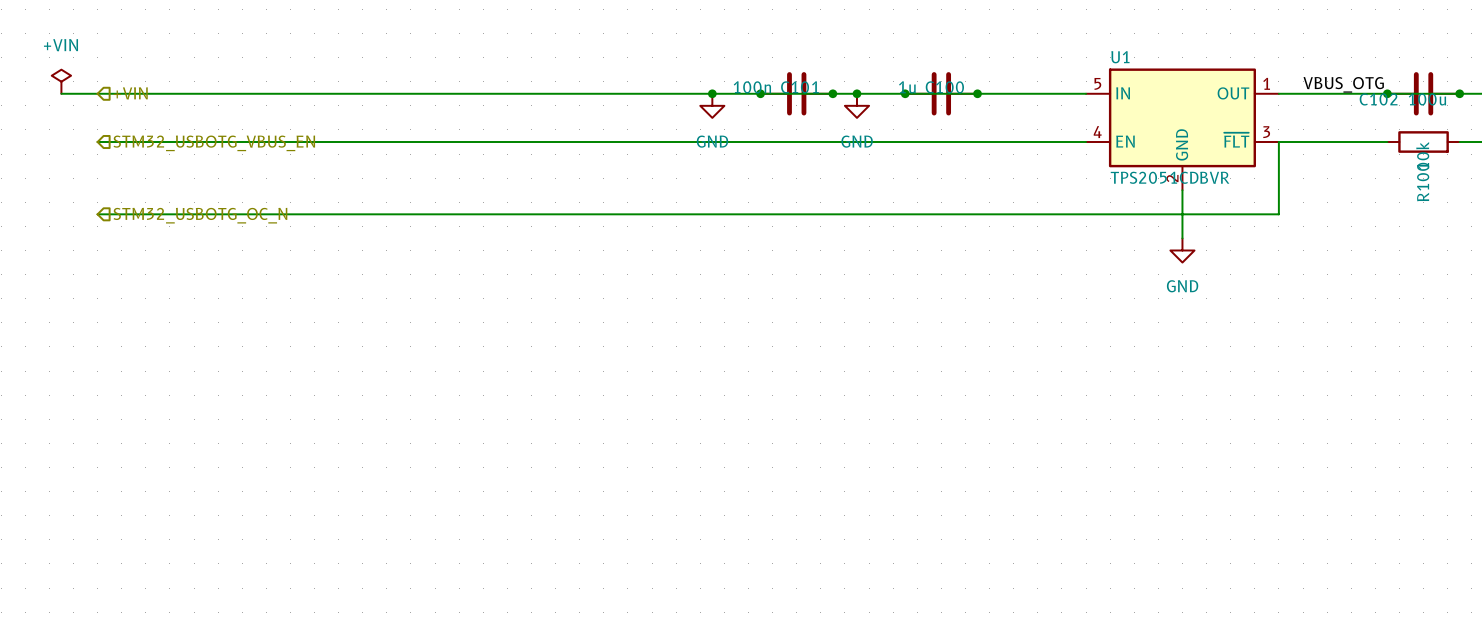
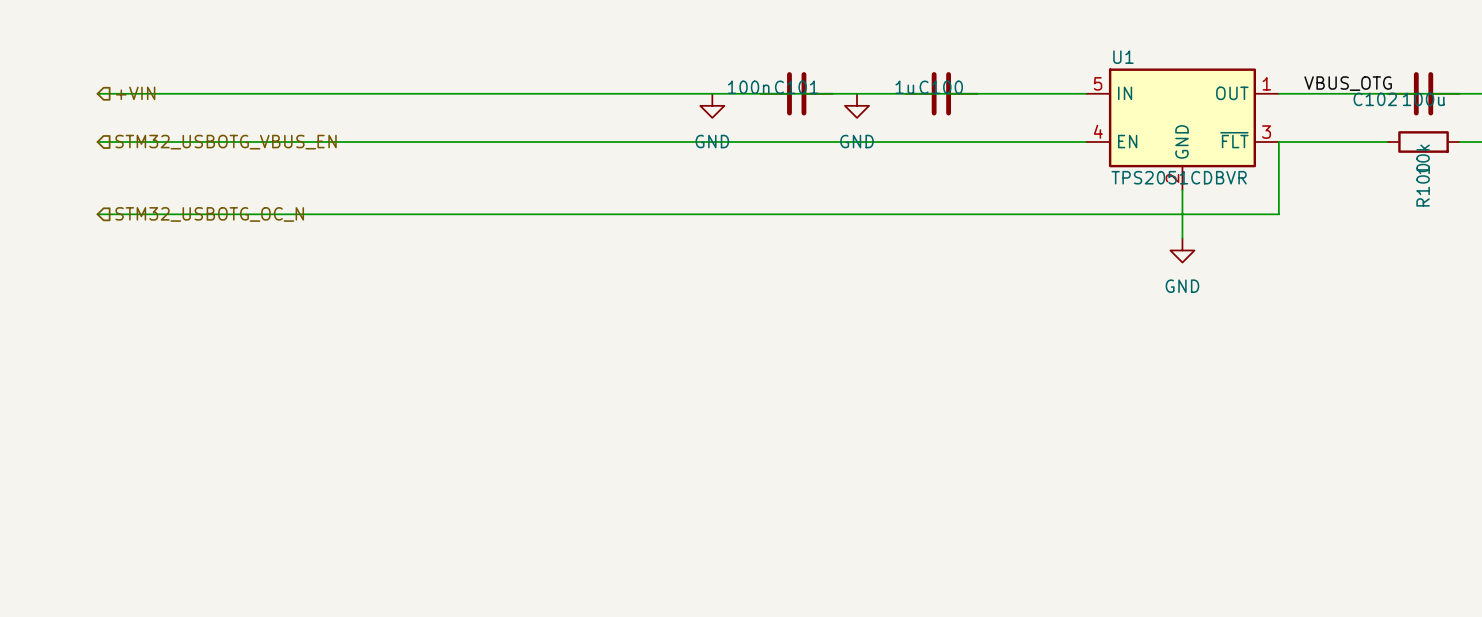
power symbol: +VIN (61, 81) -> none
wire: (61, 93) (97, 93) -> none
junction: (712, 93) -> none
junction: (760, 93) -> none
junction: (832, 93) -> none
junction: (856, 93) -> none
junction: (905, 93) -> none
junction: (977, 93) -> none
junction: (1387, 93) -> none
junction: (1459, 93) -> none

